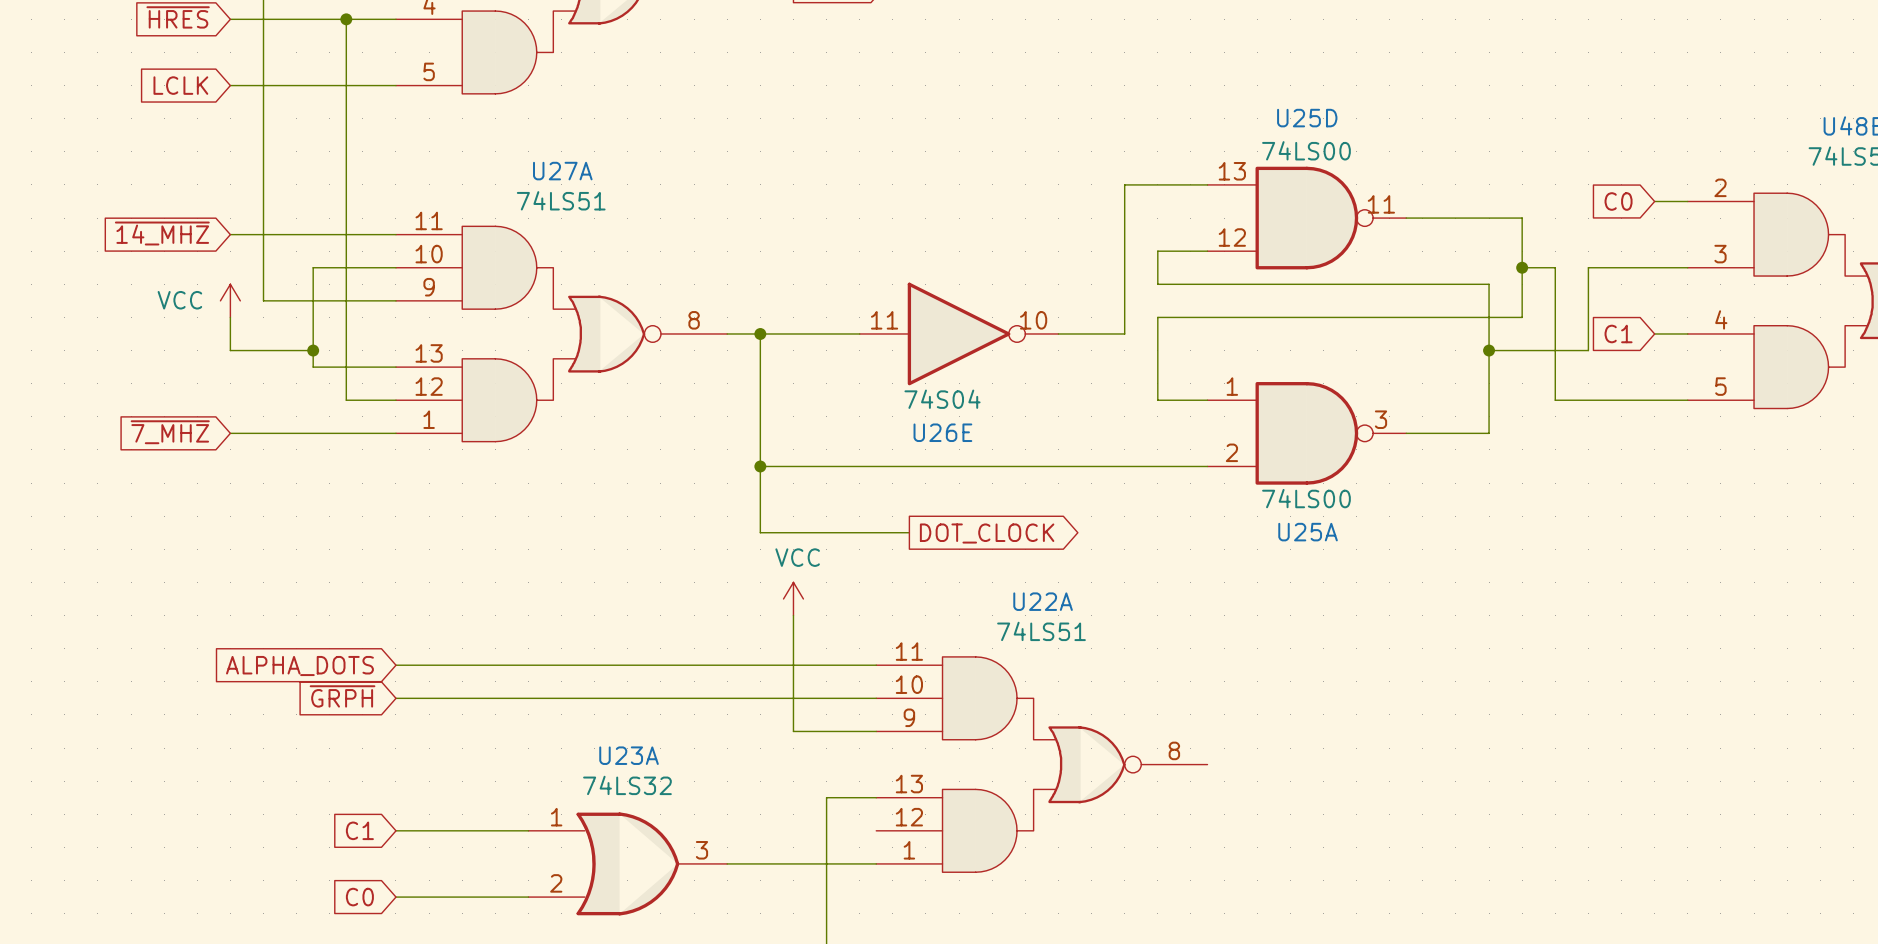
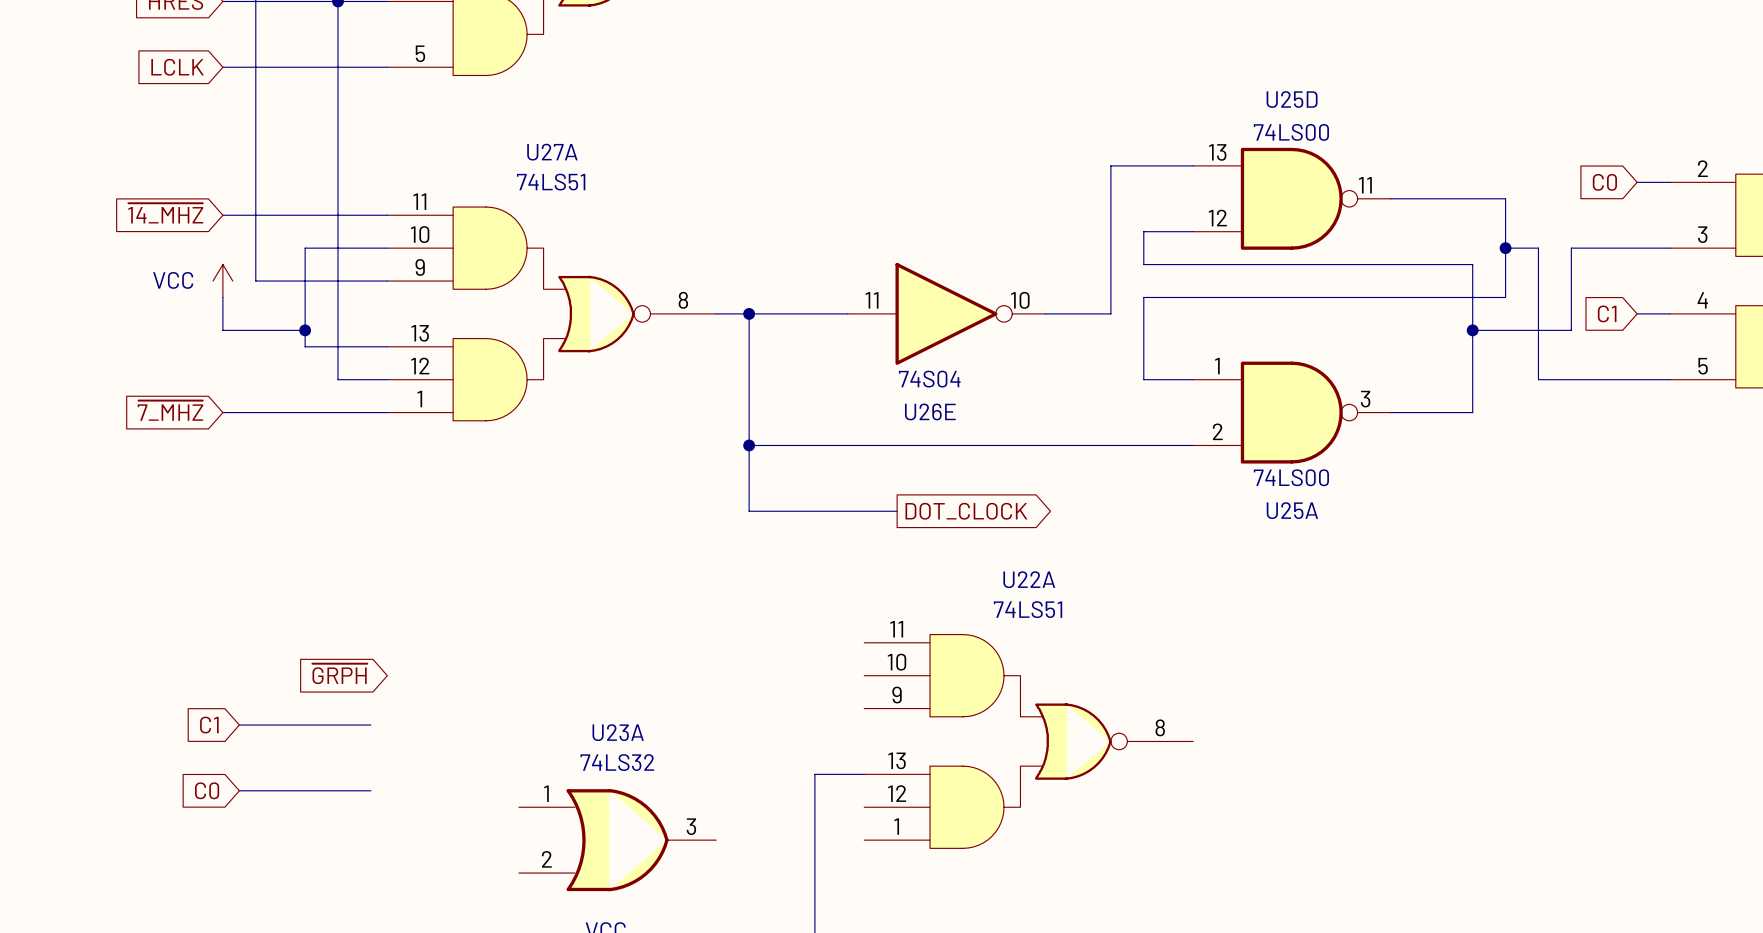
power symbol: VCC (793, 598) -> none
wire: (793, 615) (793, 731) (876, 731) -> none
wire: (395, 665) (876, 665) -> none
global label: ALPHA_DOTS (299, 666) -> none
wire: (395, 698) (876, 698) -> none
global label position: C1 (359, 830) -> C1 (209, 725)
wire: (395, 830) (528, 830) -> (239, 725) (370, 725)
wire: (727, 863) (876, 863) -> none
global label position: C0 (359, 897) -> C0 (207, 790)
wire: (395, 897) (528, 897) -> (239, 790) (370, 790)

